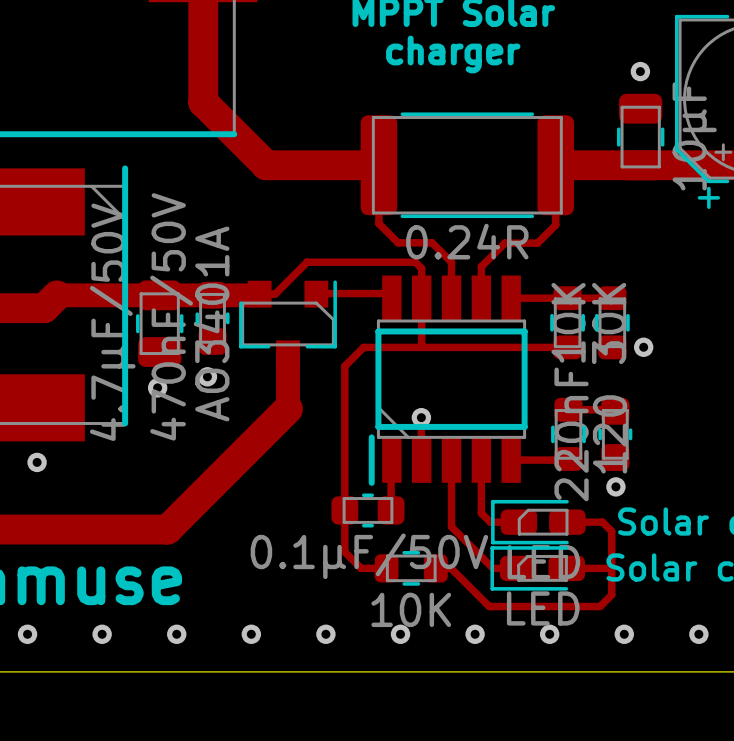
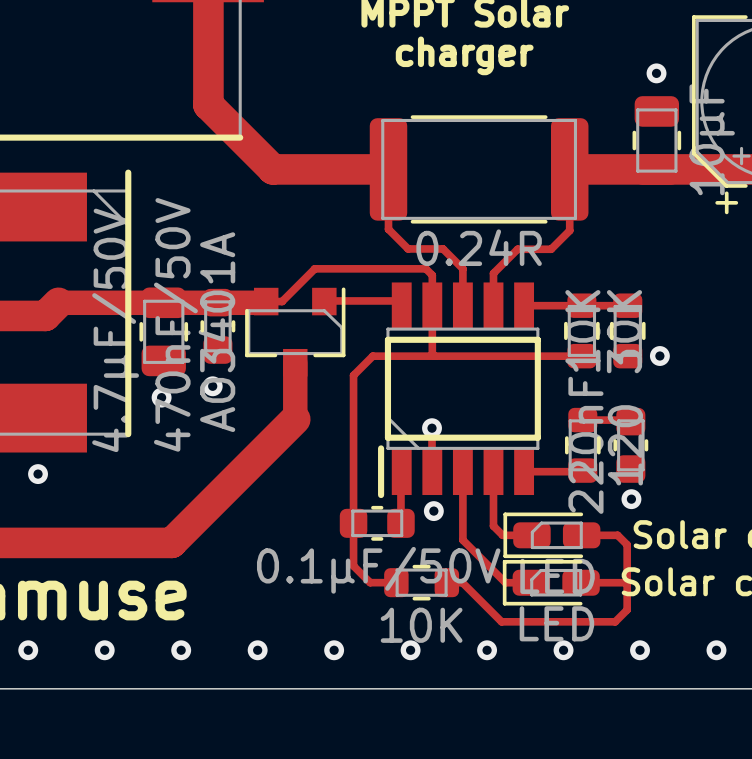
via: none -> (433, 511)

